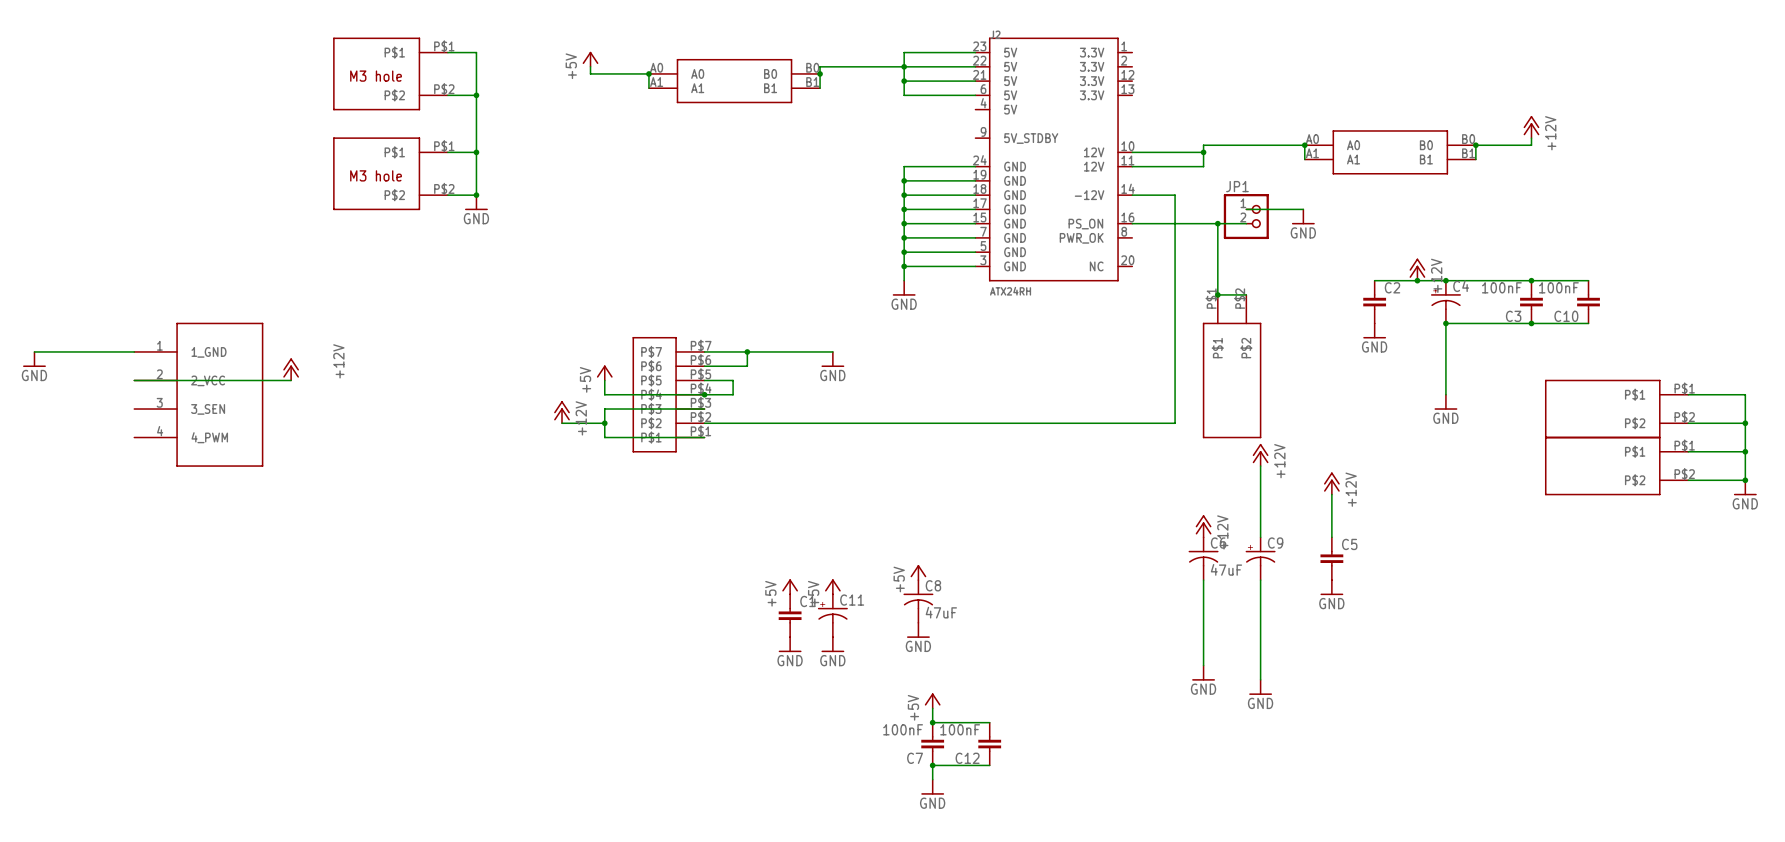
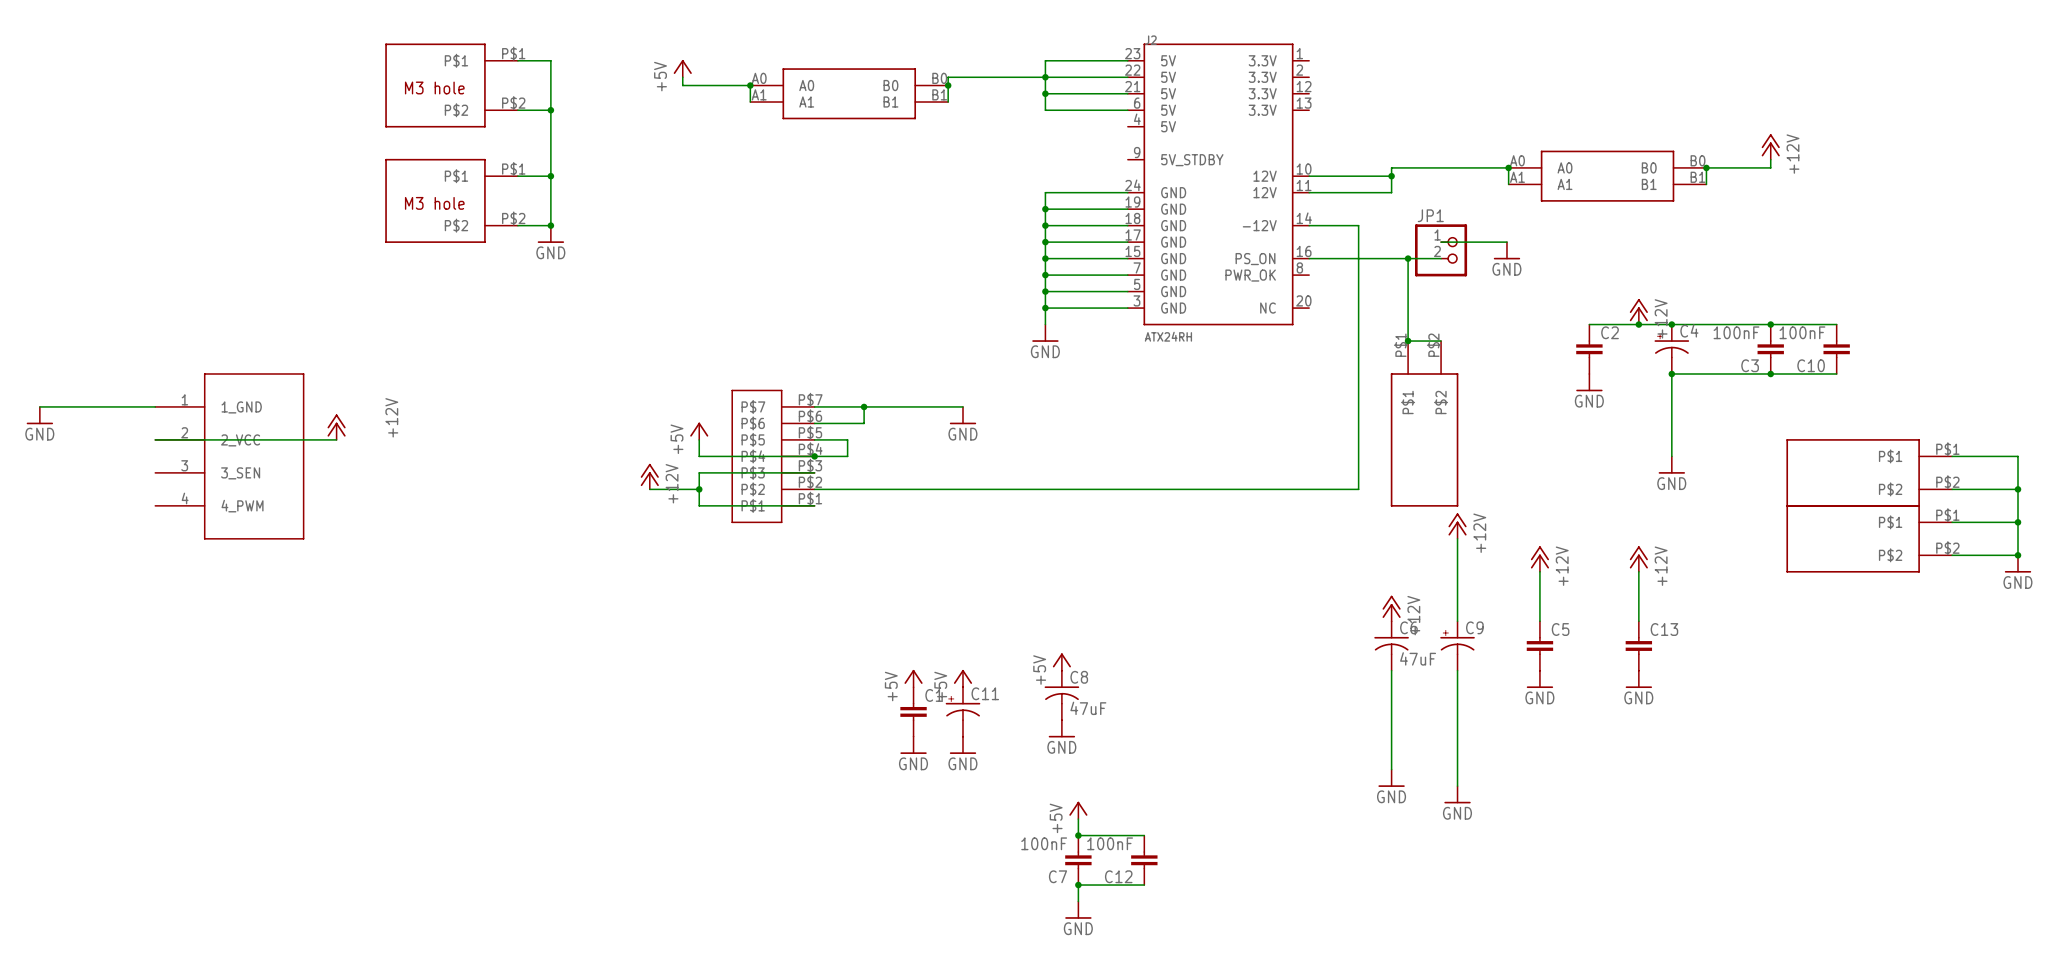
power symbol: none -> +12V (1638, 559)
wire: none -> (1638, 571) (1638, 621)
C13: none -> (1638, 645)
power symbol: none -> GND (1638, 679)

